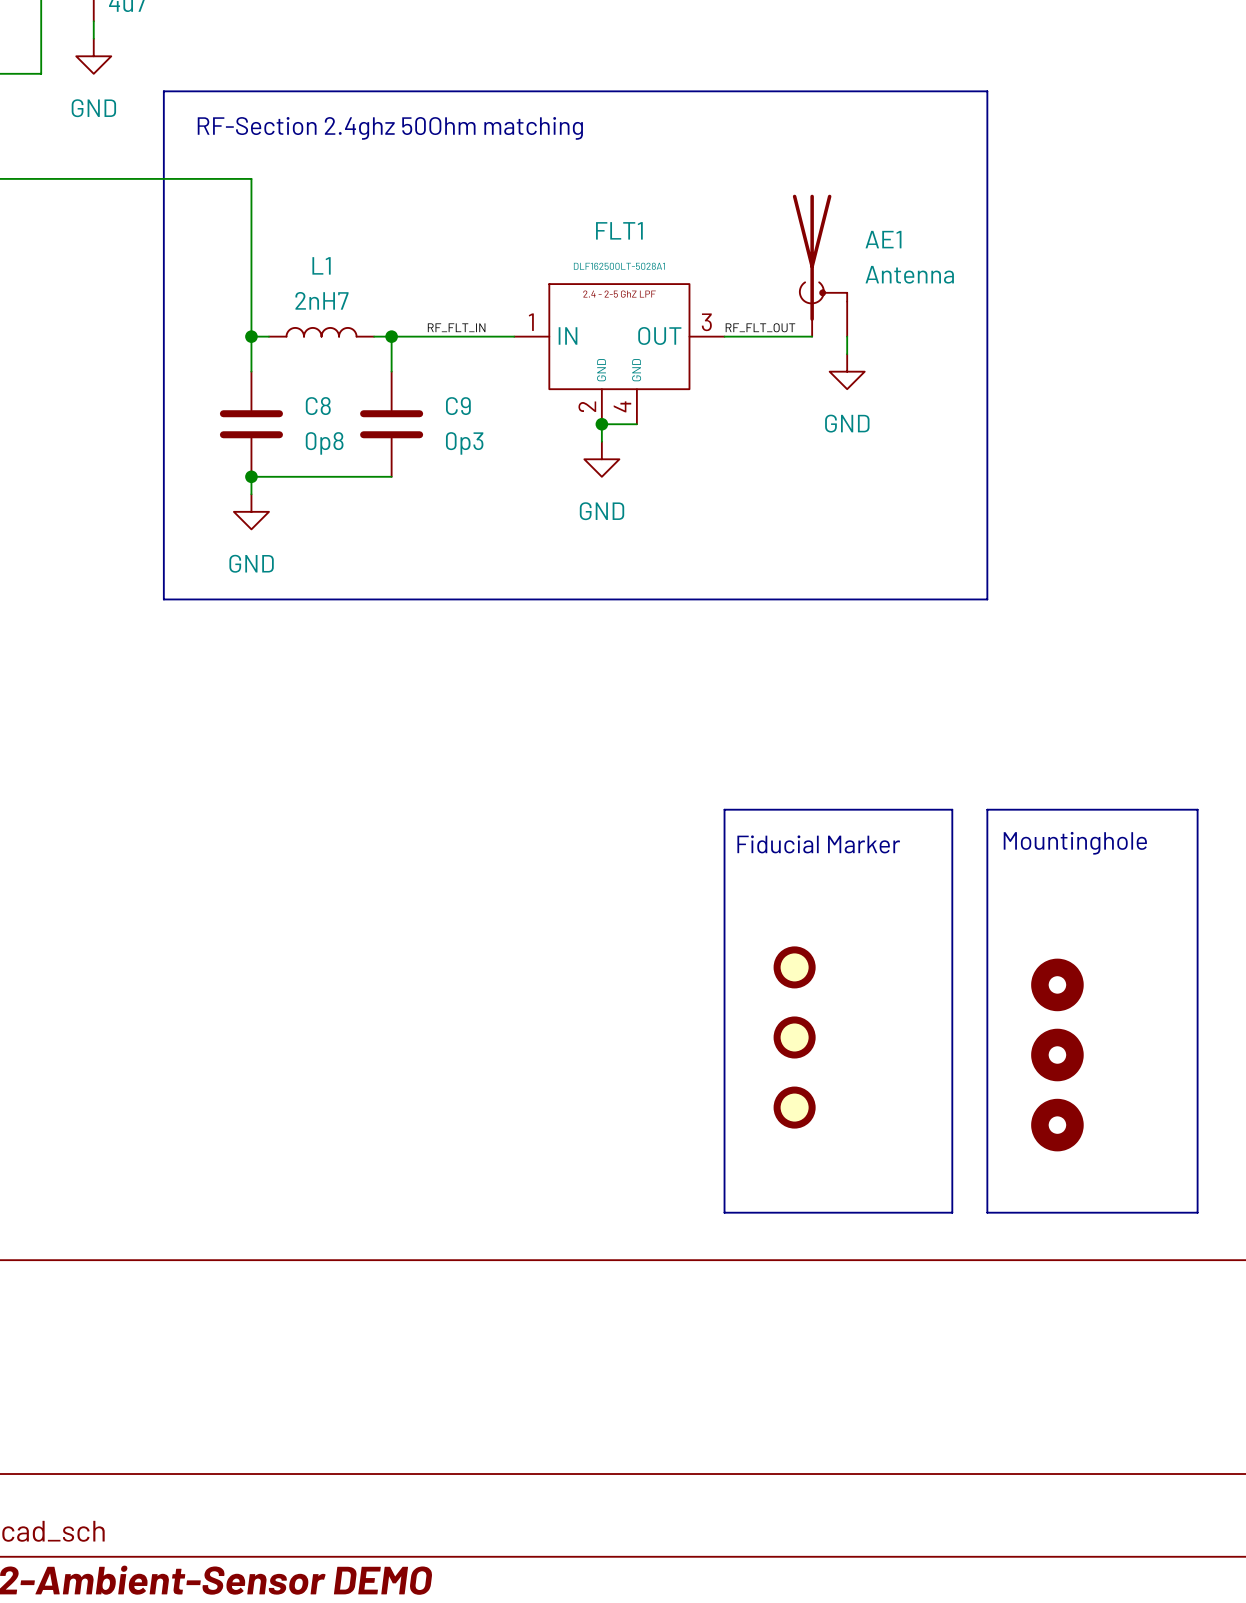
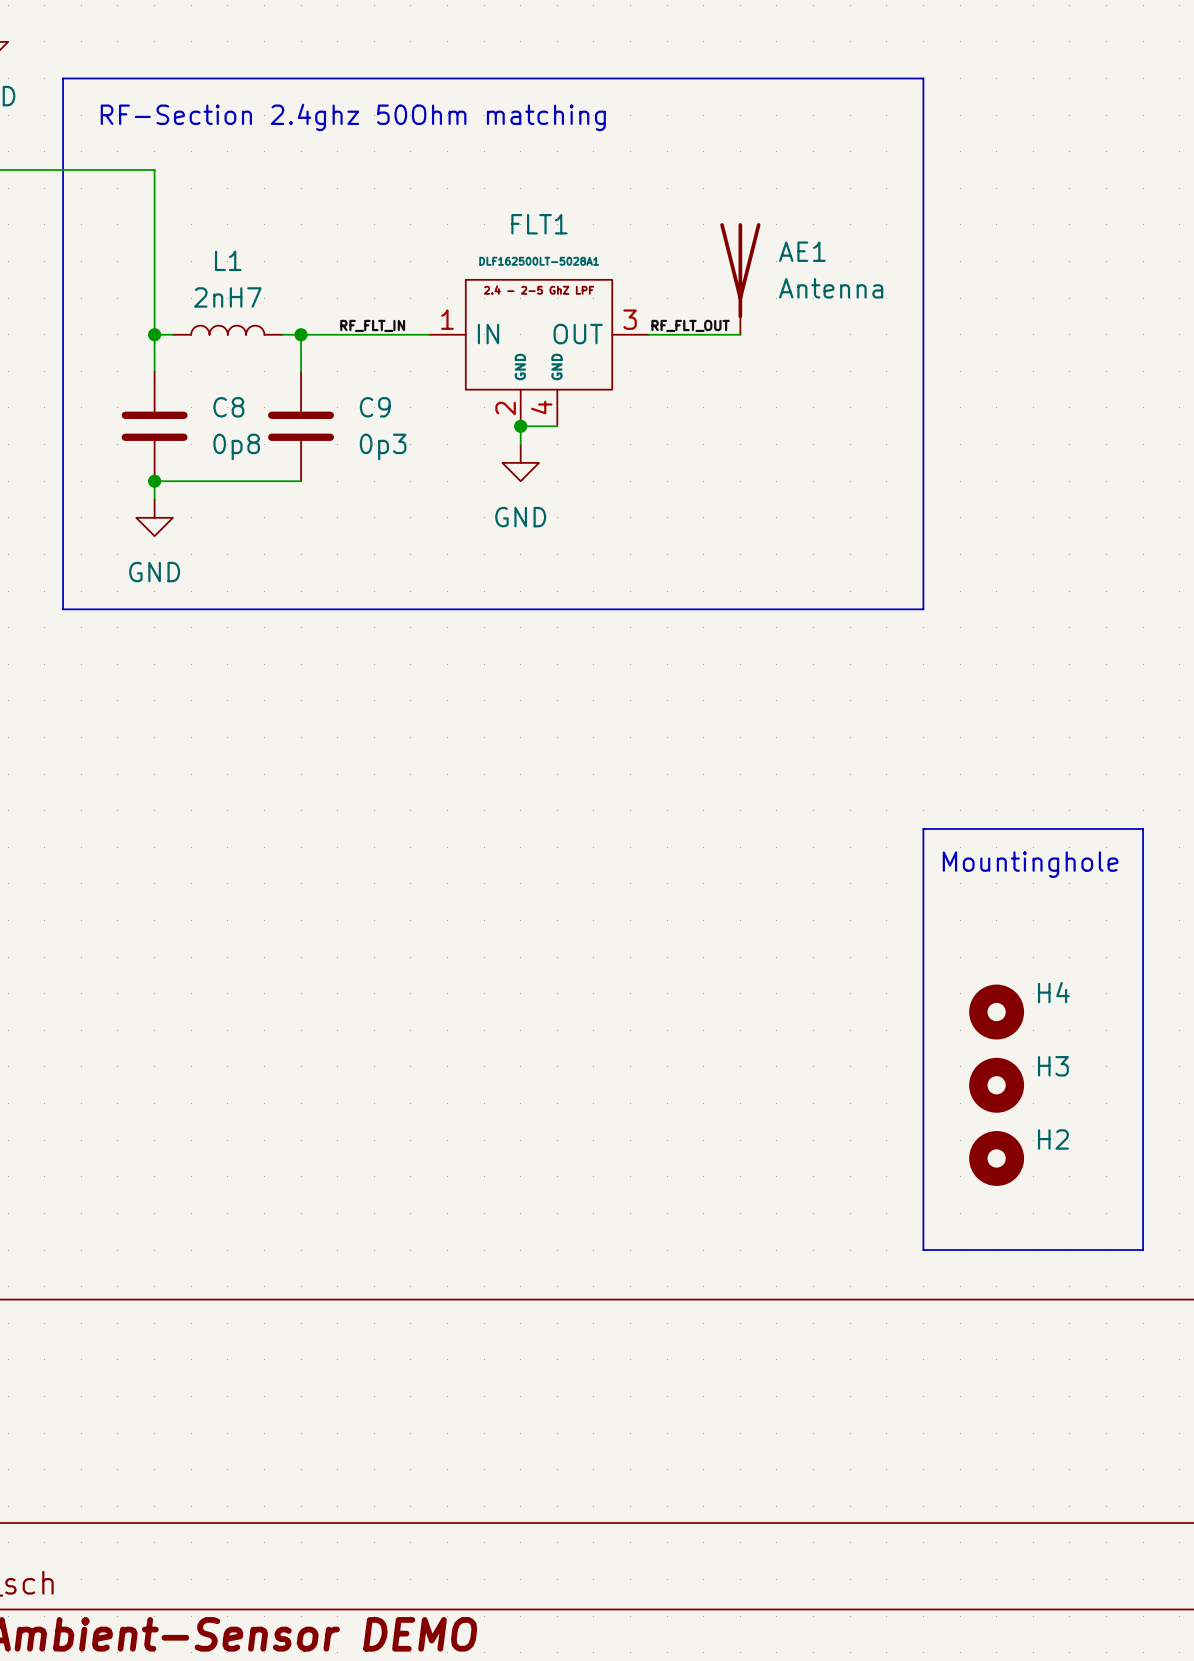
AE1 symbol: [792, 194, 848, 337] -> [720, 223, 761, 335]
wire: (847, 336) (847, 354) -> none
power symbol: GND (847, 371) -> none
line: (724, 809) (952, 809) (952, 1212) (724, 1212) (724, 809) -> none
text: Fiducial Marker (818, 844) -> none
H4 name: none -> H4 (1053, 992)
part: (794, 967) -> none
H3 name: none -> H3 (1053, 1066)
part: (794, 1037) -> none
H2 name: none -> H2 (1053, 1139)
part: (794, 1107) -> none

